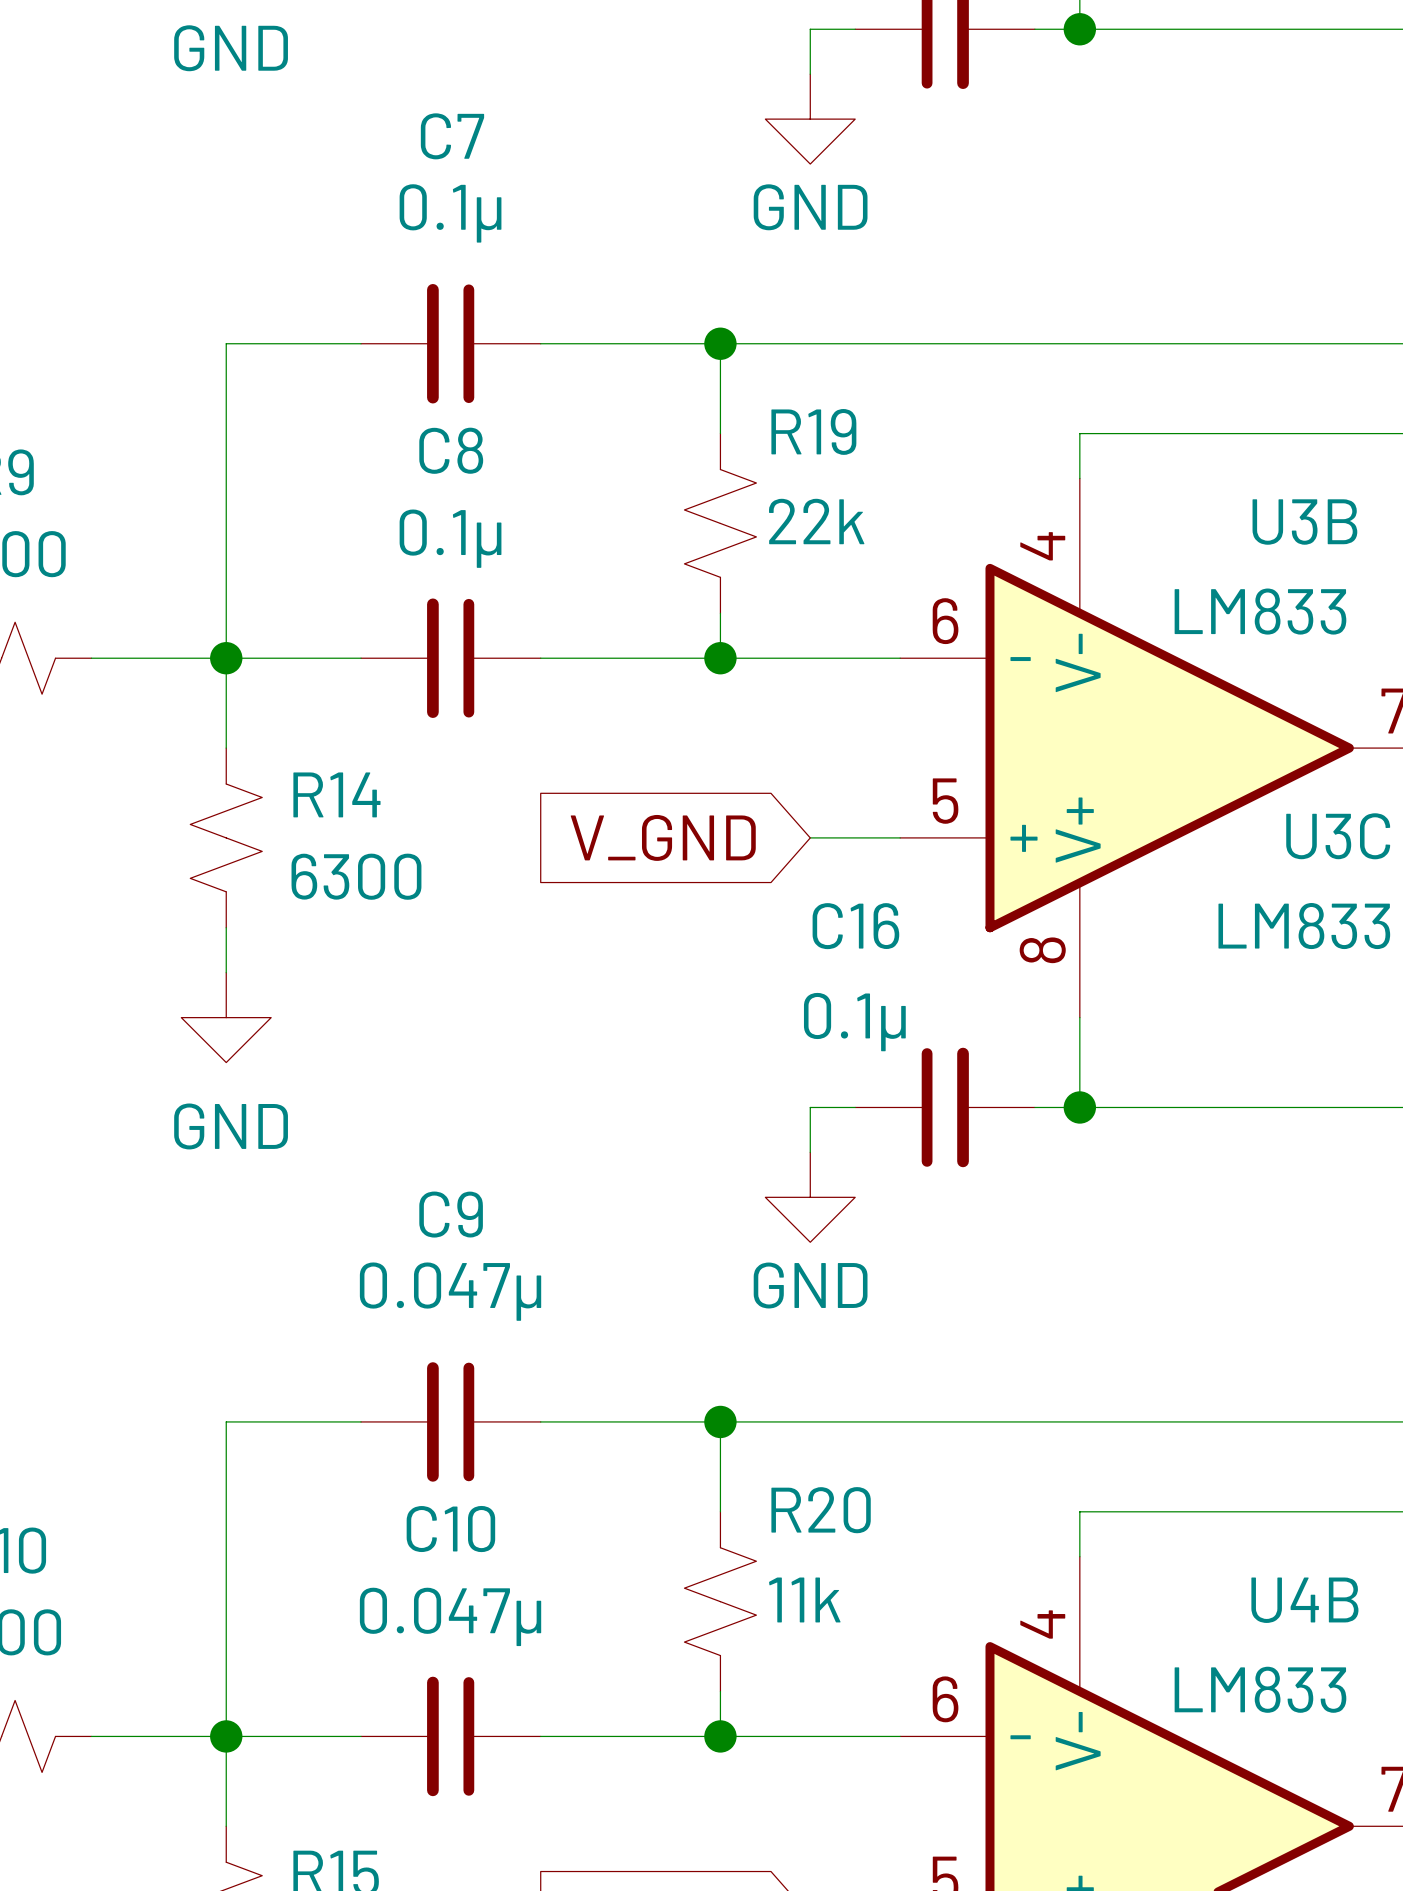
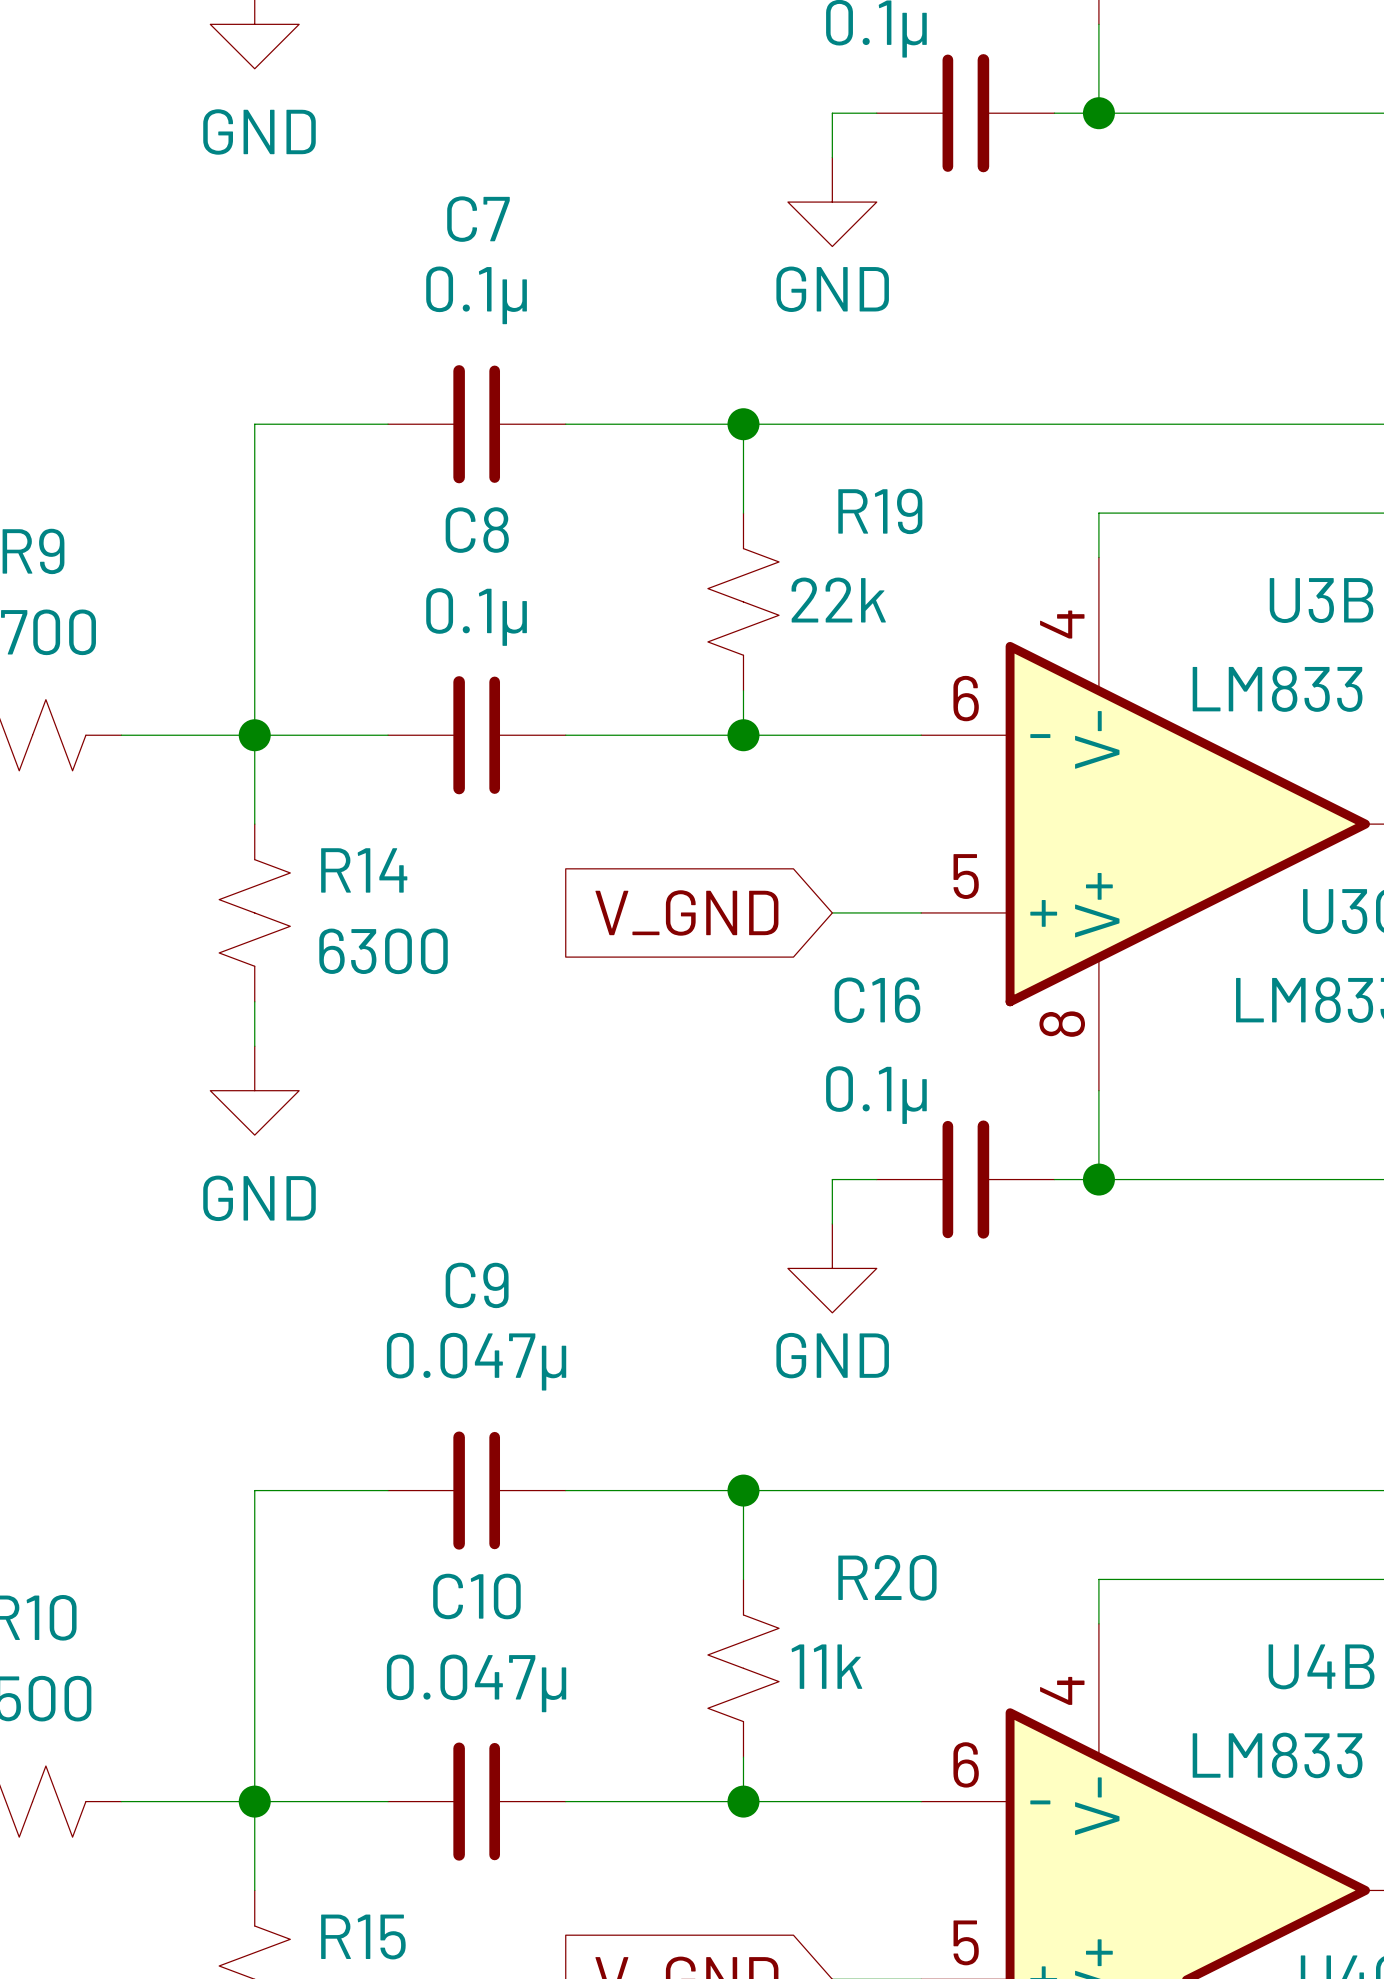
R19 name position: R19 (813, 431) -> R19 (880, 511)
R20 name position: R20 (821, 1510) -> R20 (887, 1577)

